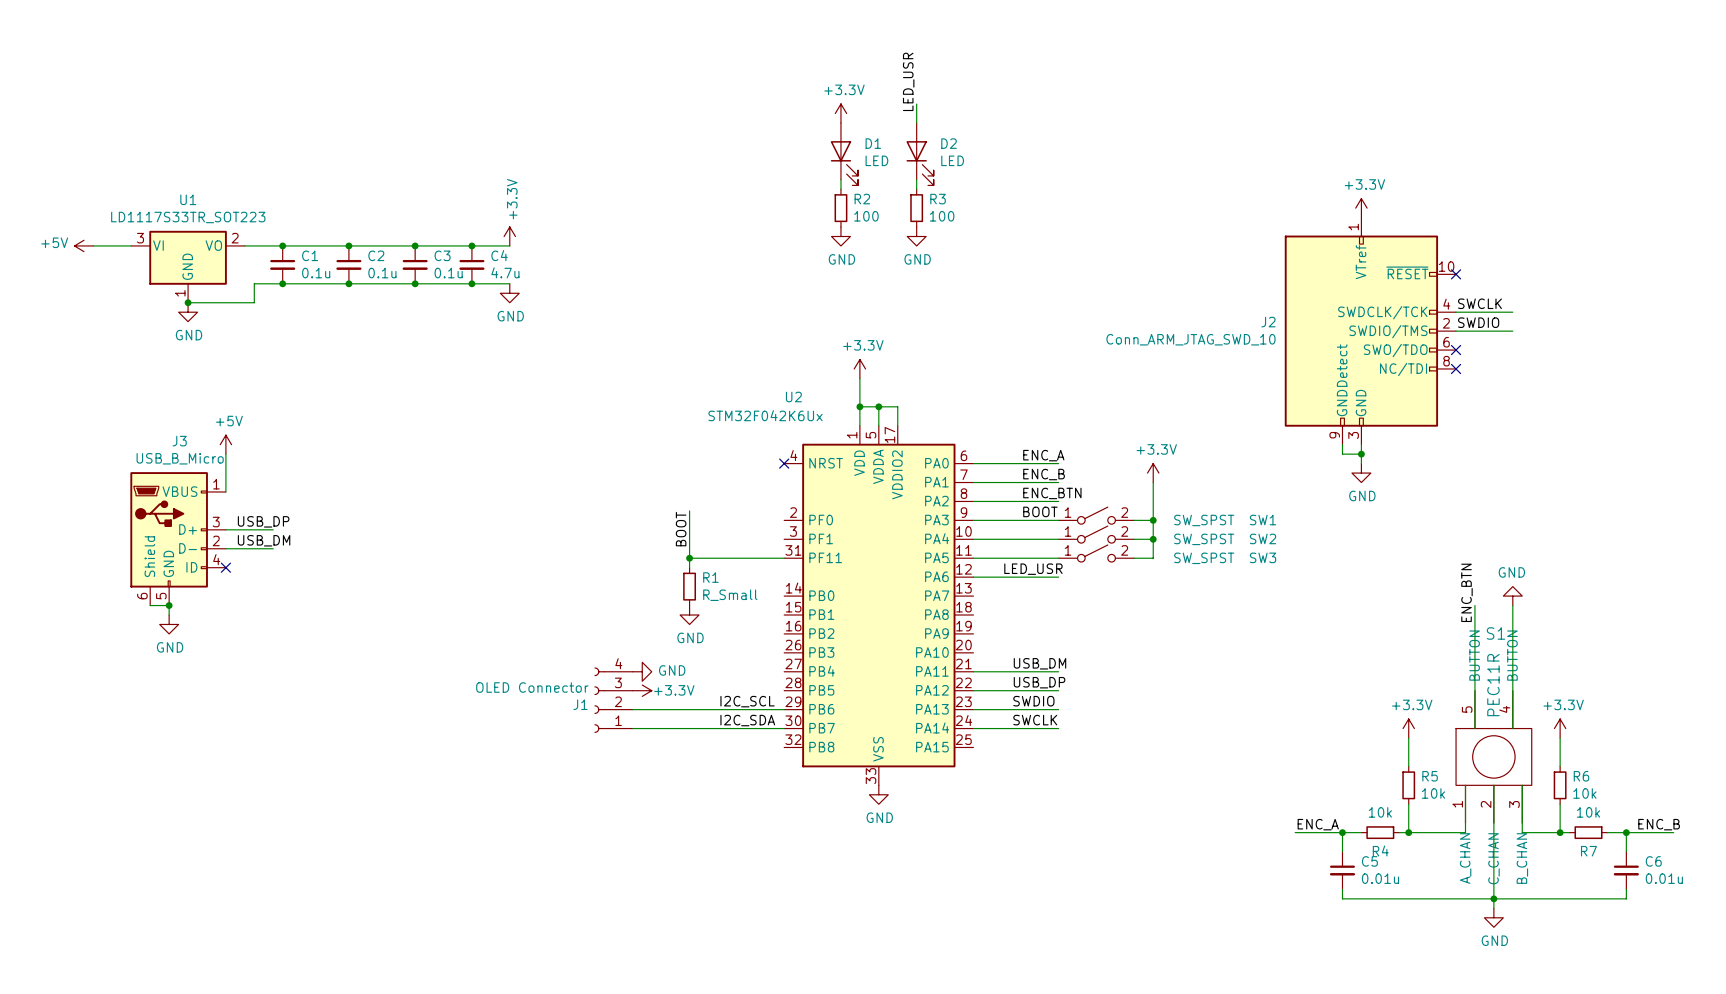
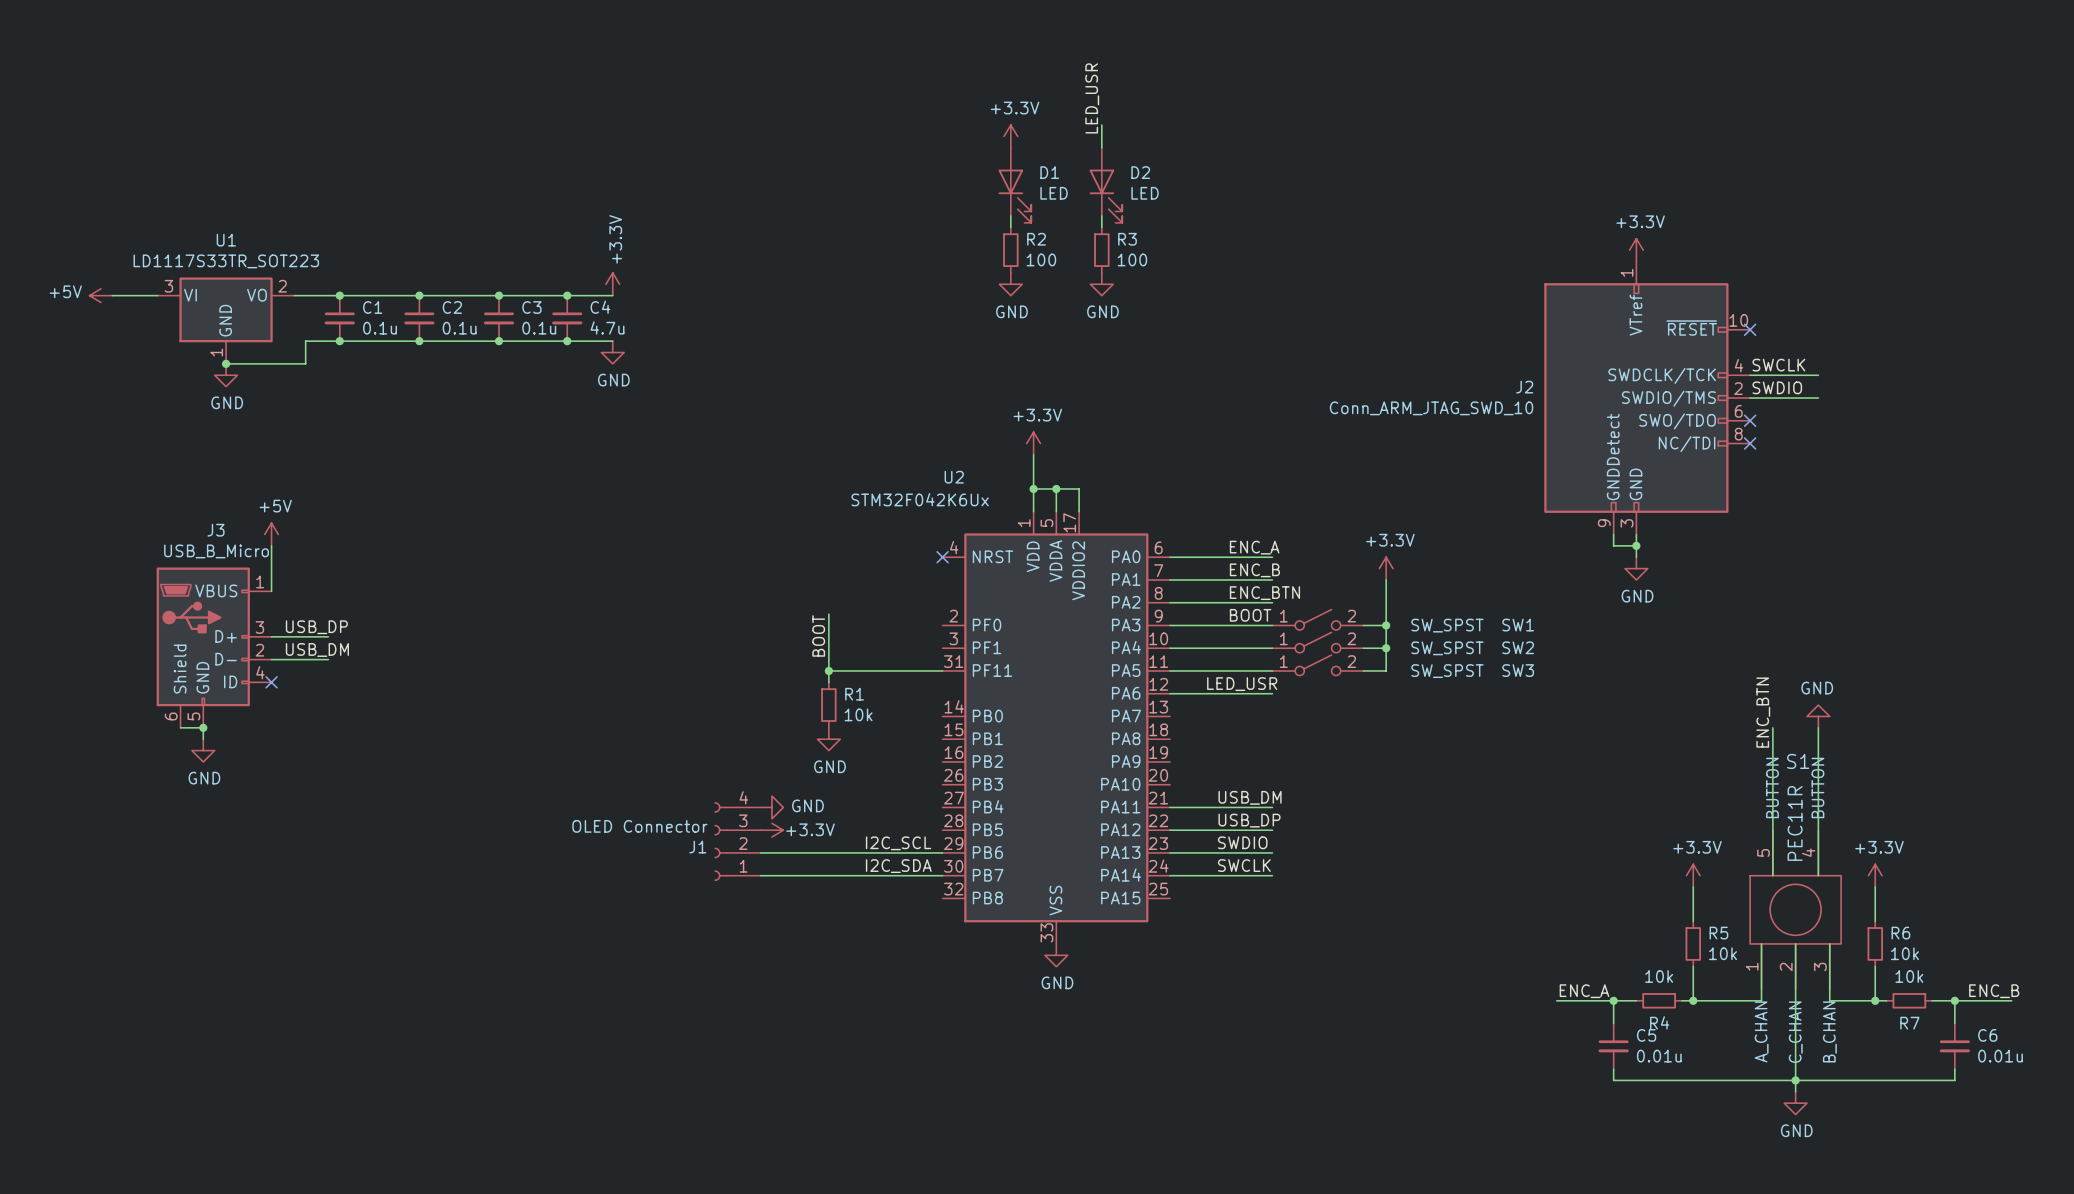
R1 value: R_Small (730, 595) -> 10k (858, 714)

